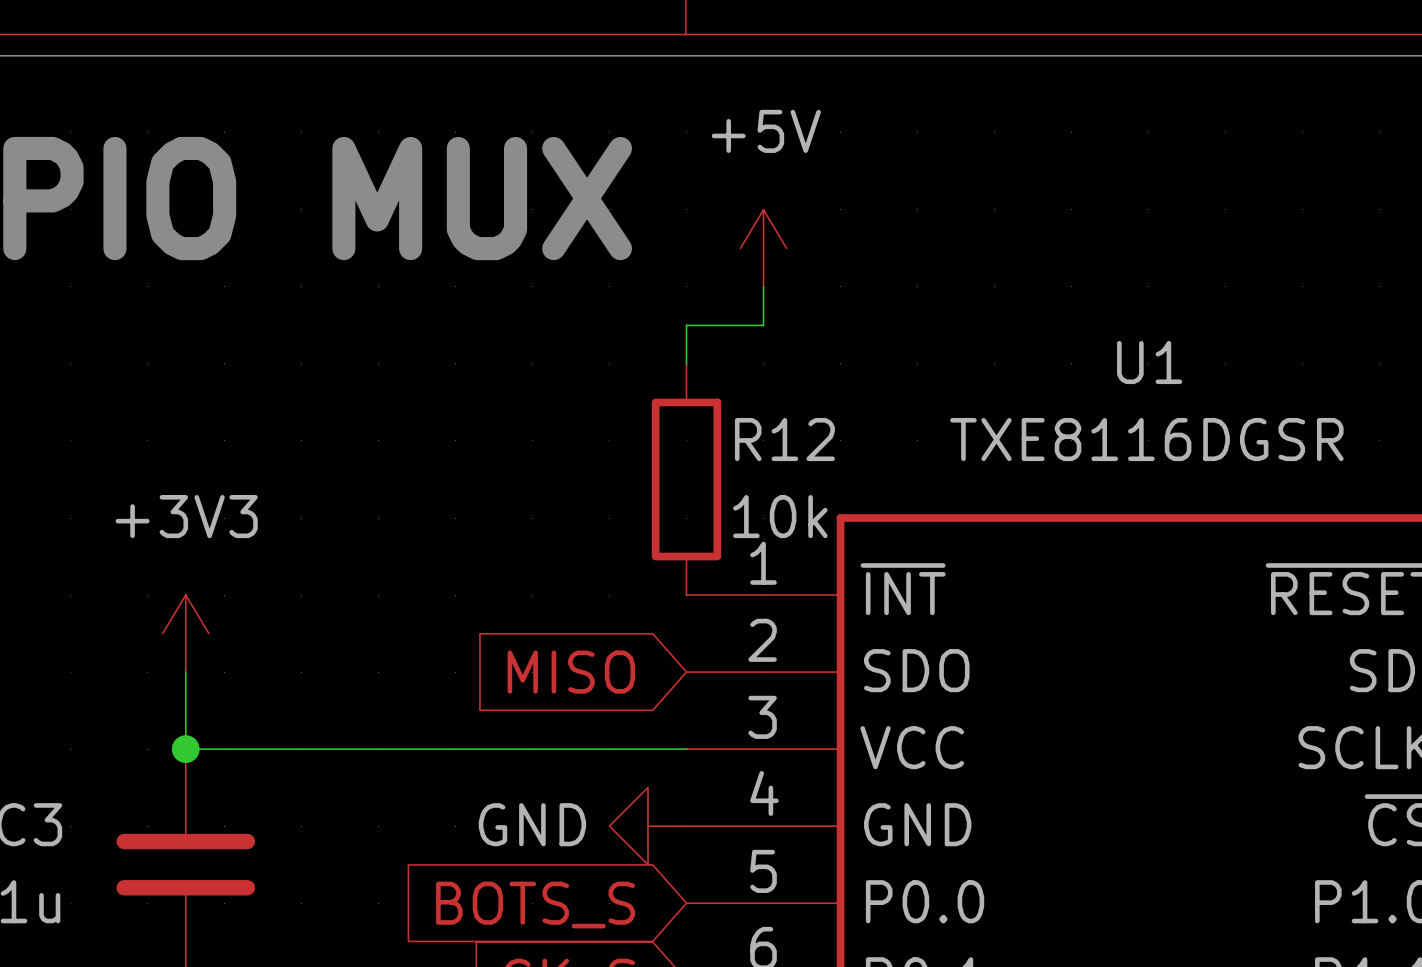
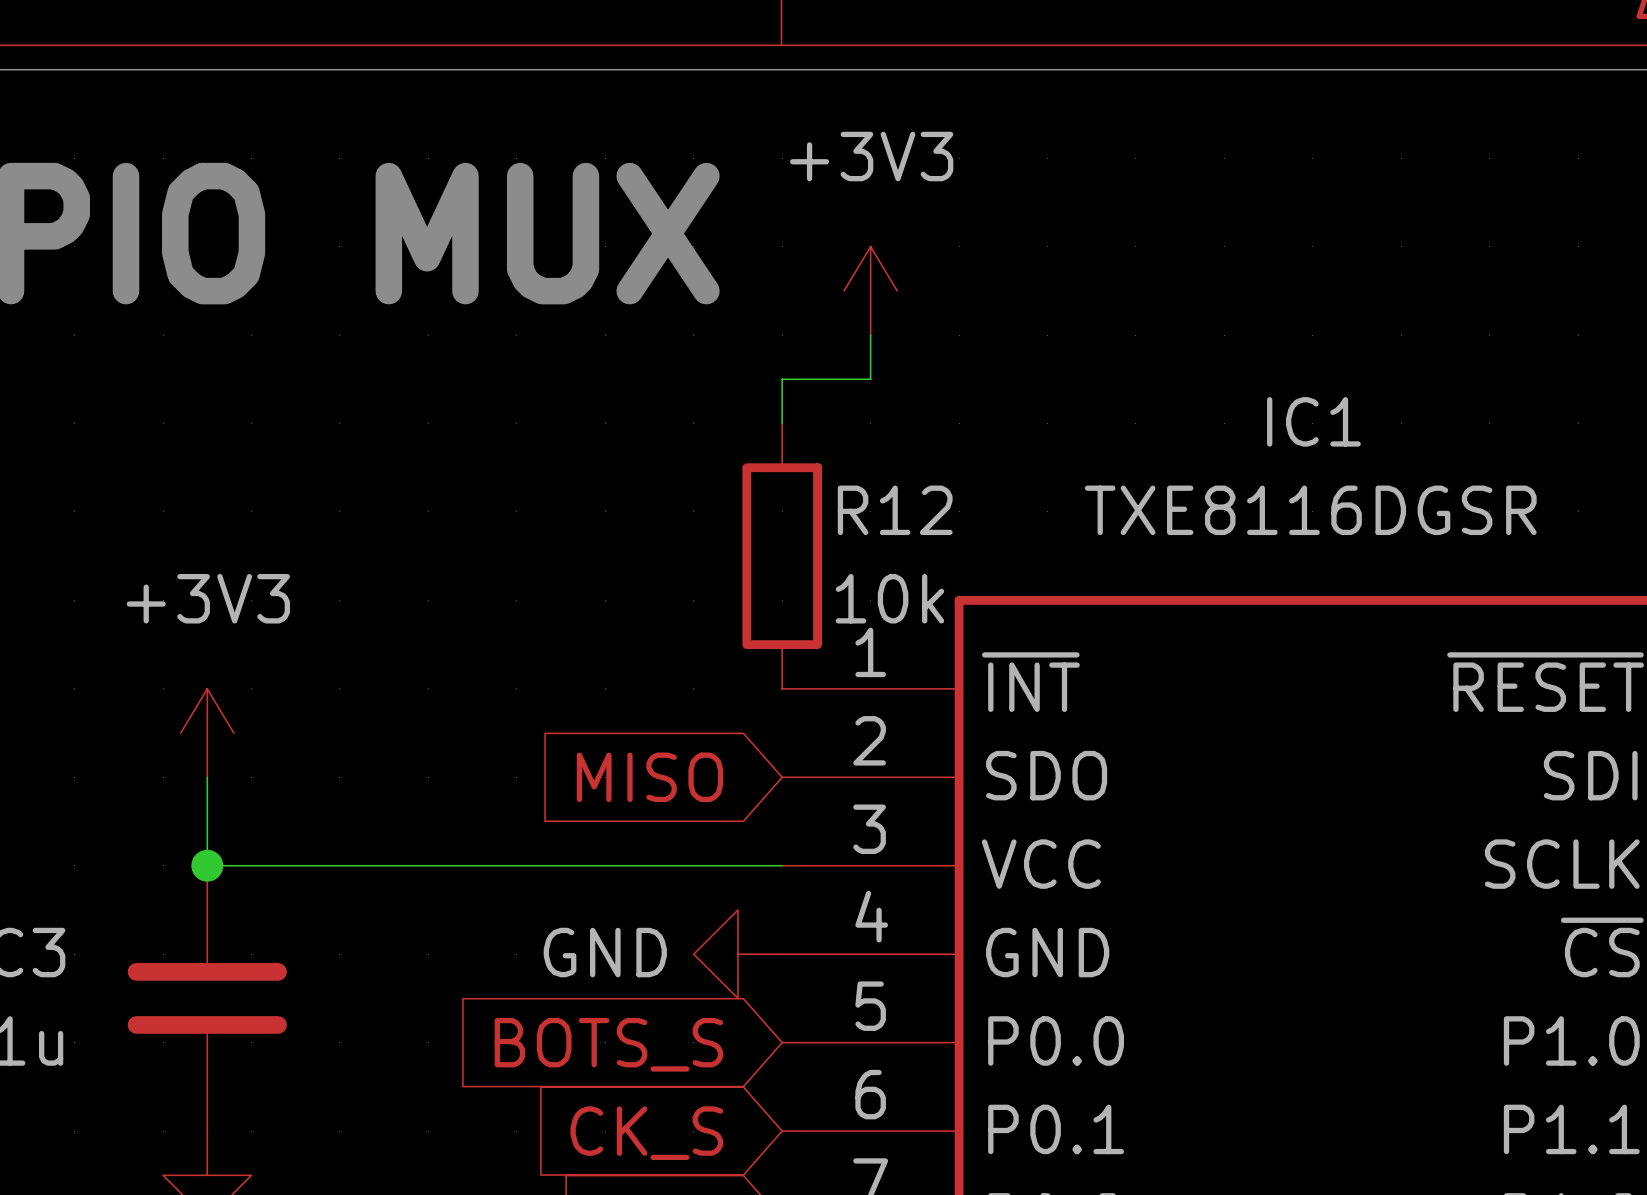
power symbol: +5V (763, 248) -> +3V3 (870, 290)
U1 name: U1 (1149, 362) -> IC1 (1313, 421)

